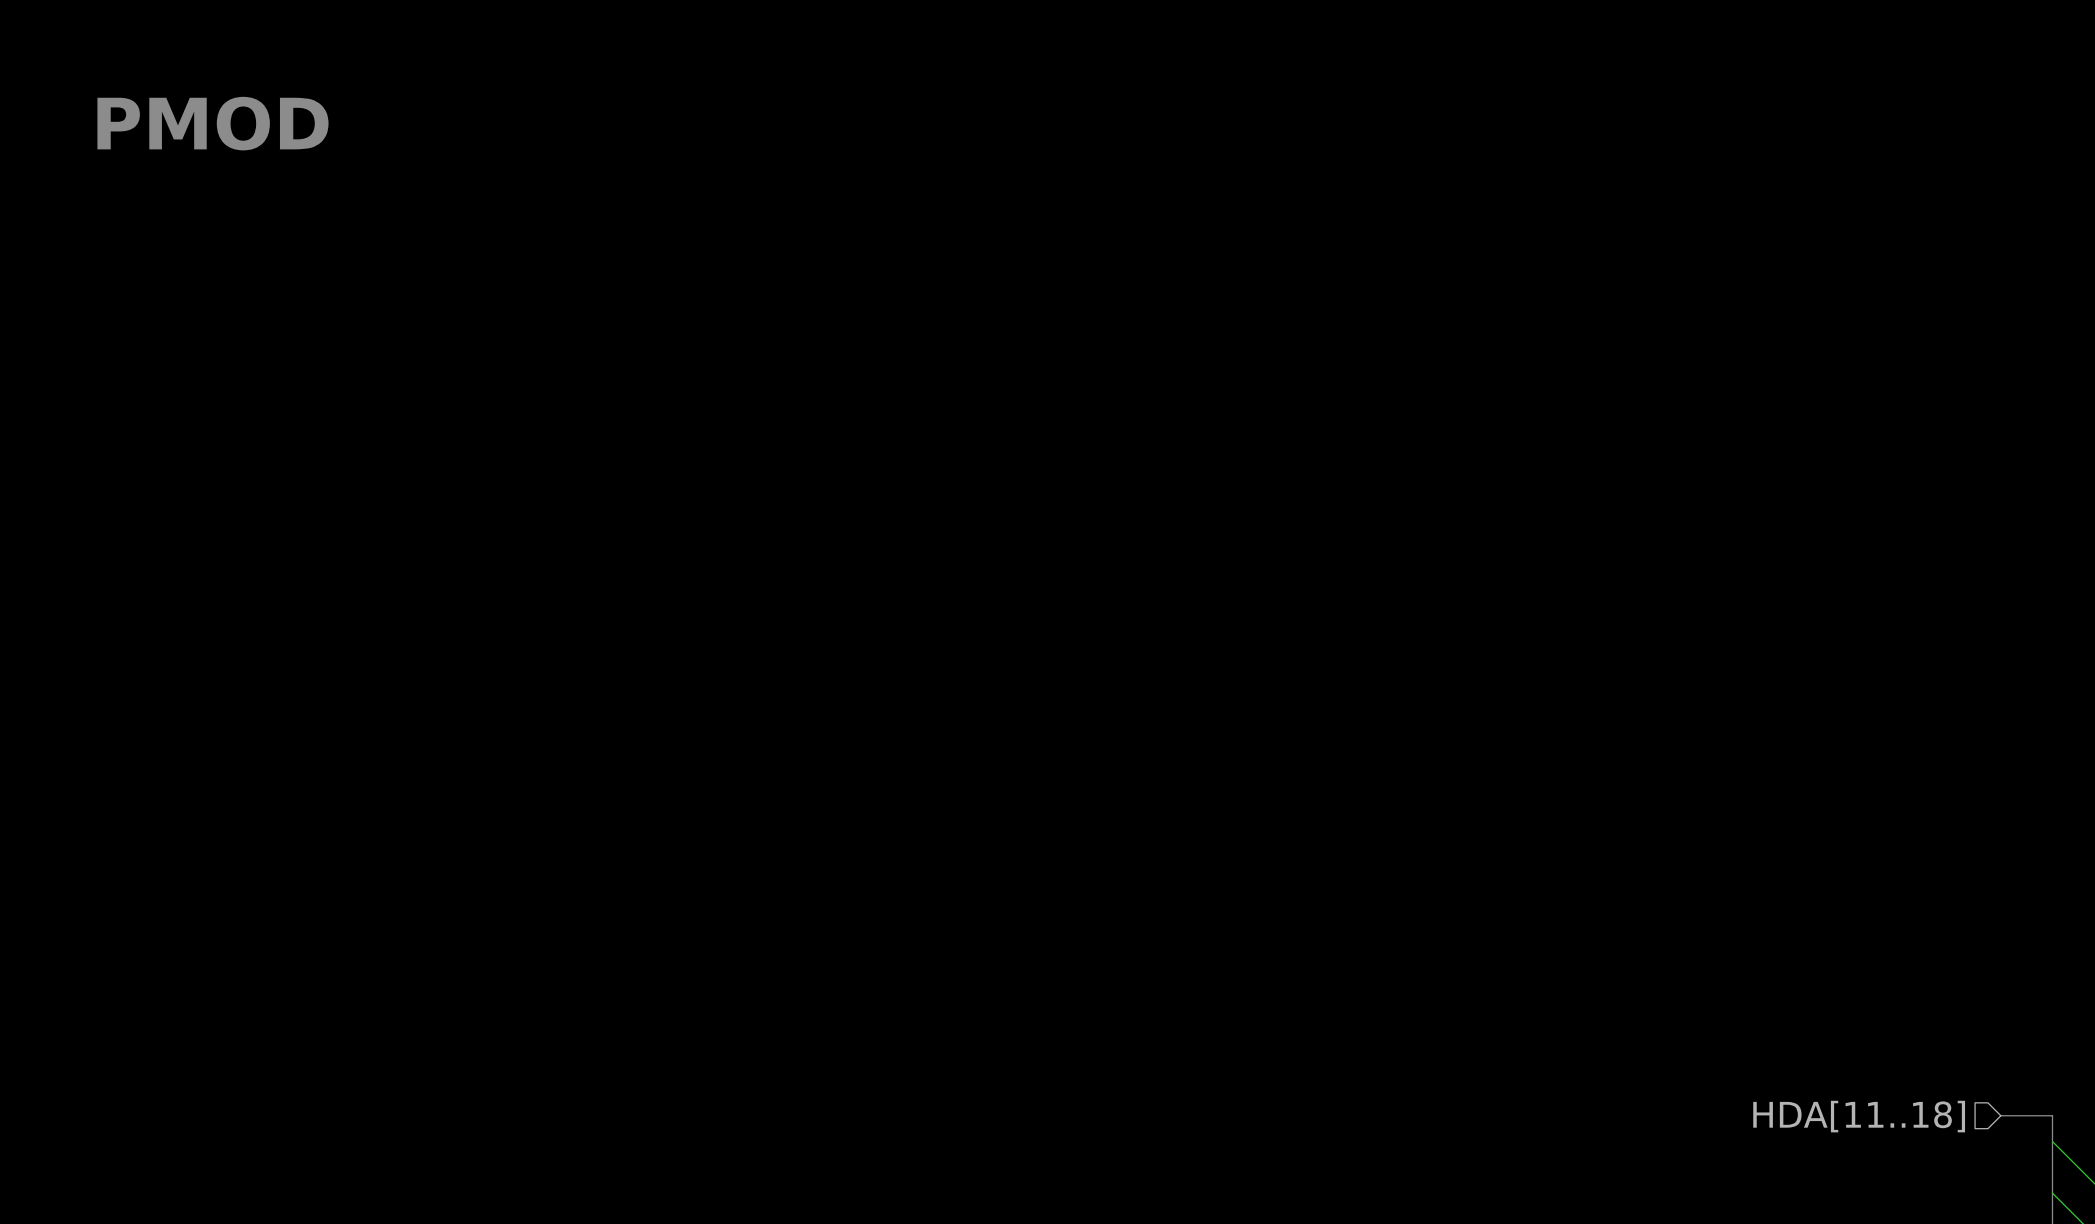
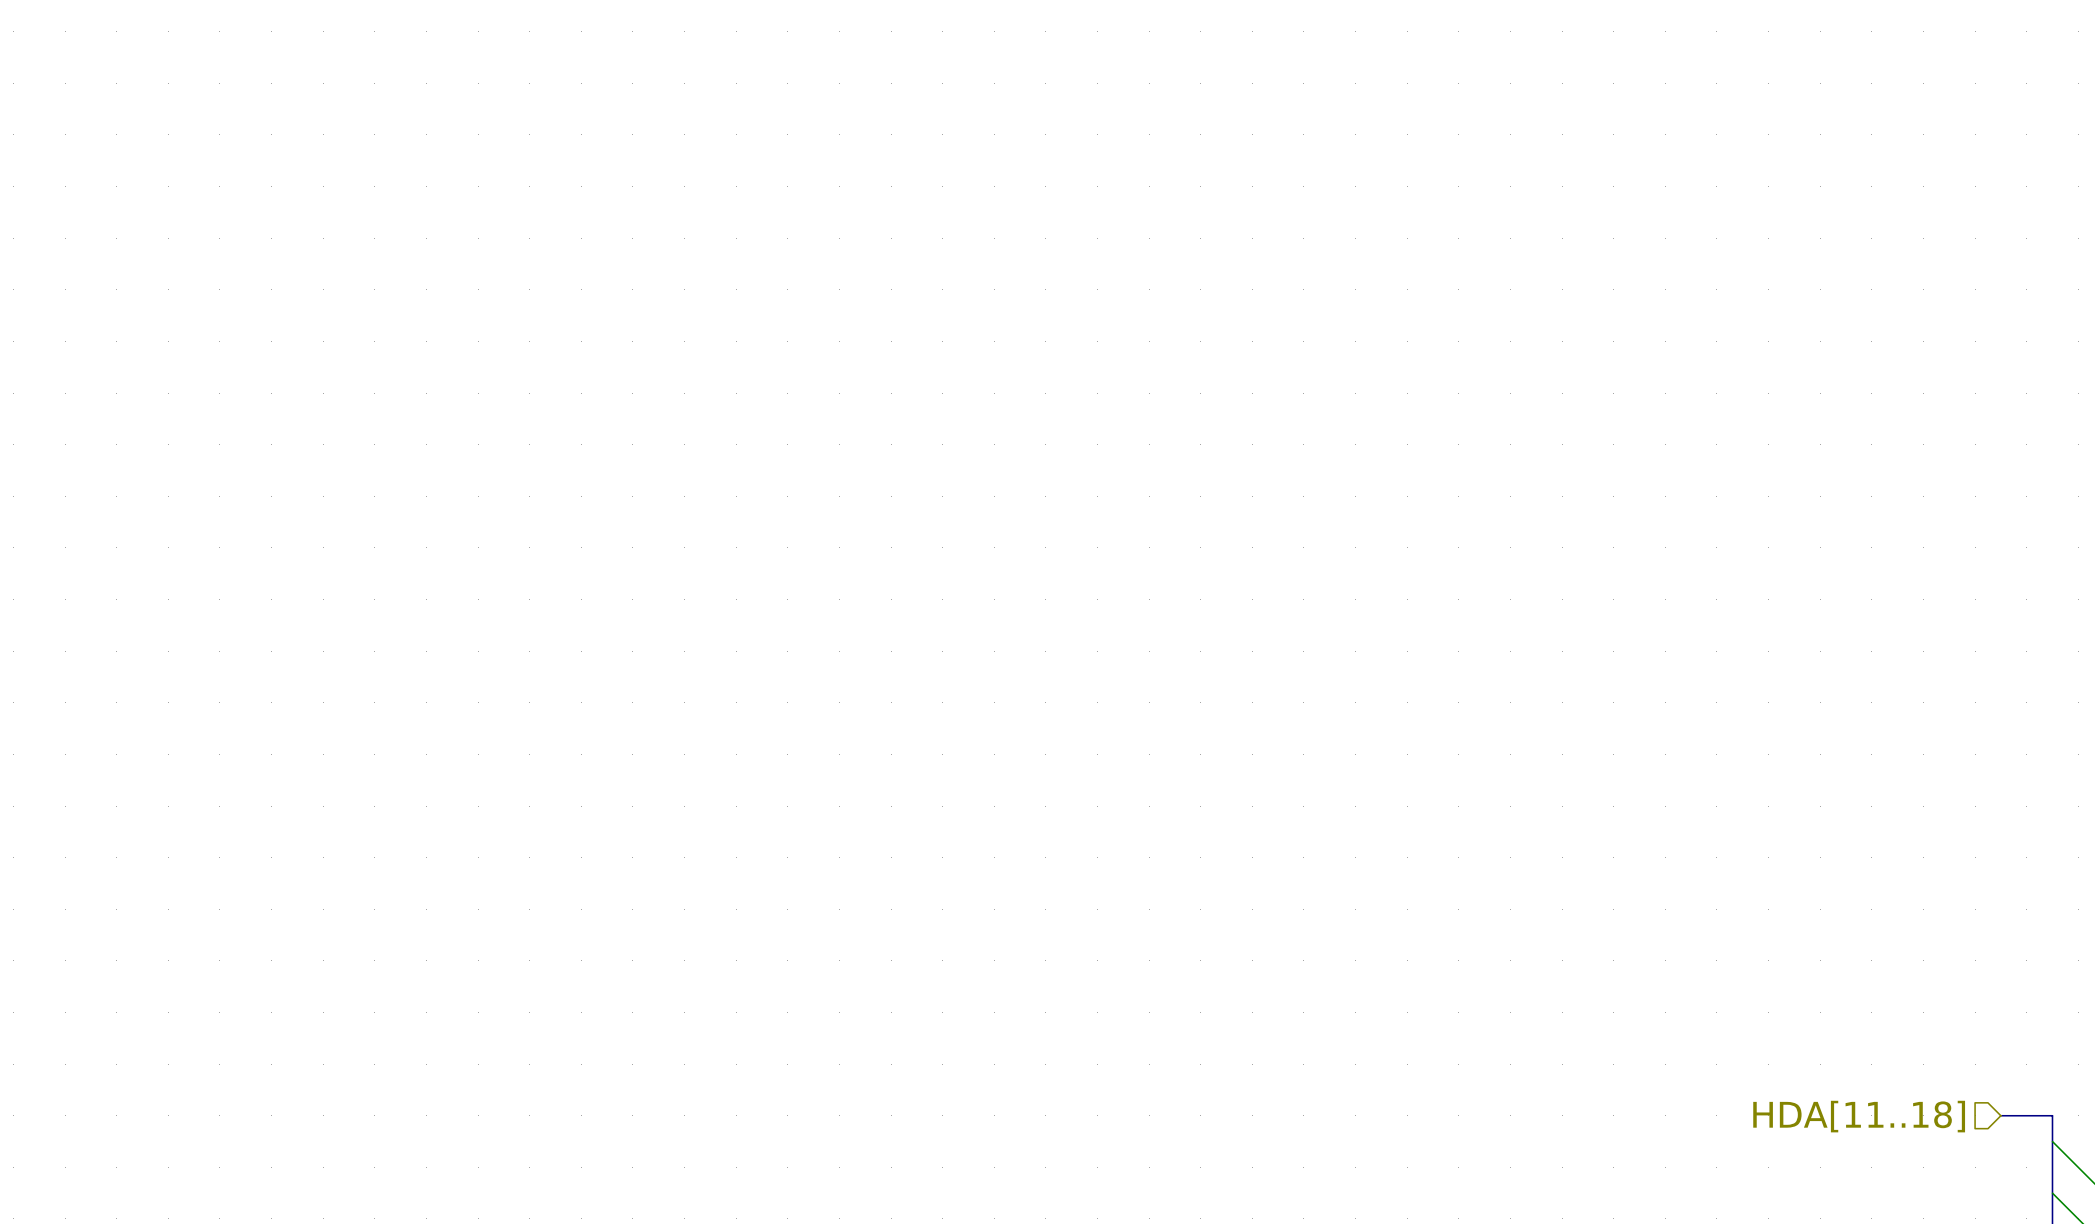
text: PMOD (212, 123) -> none

